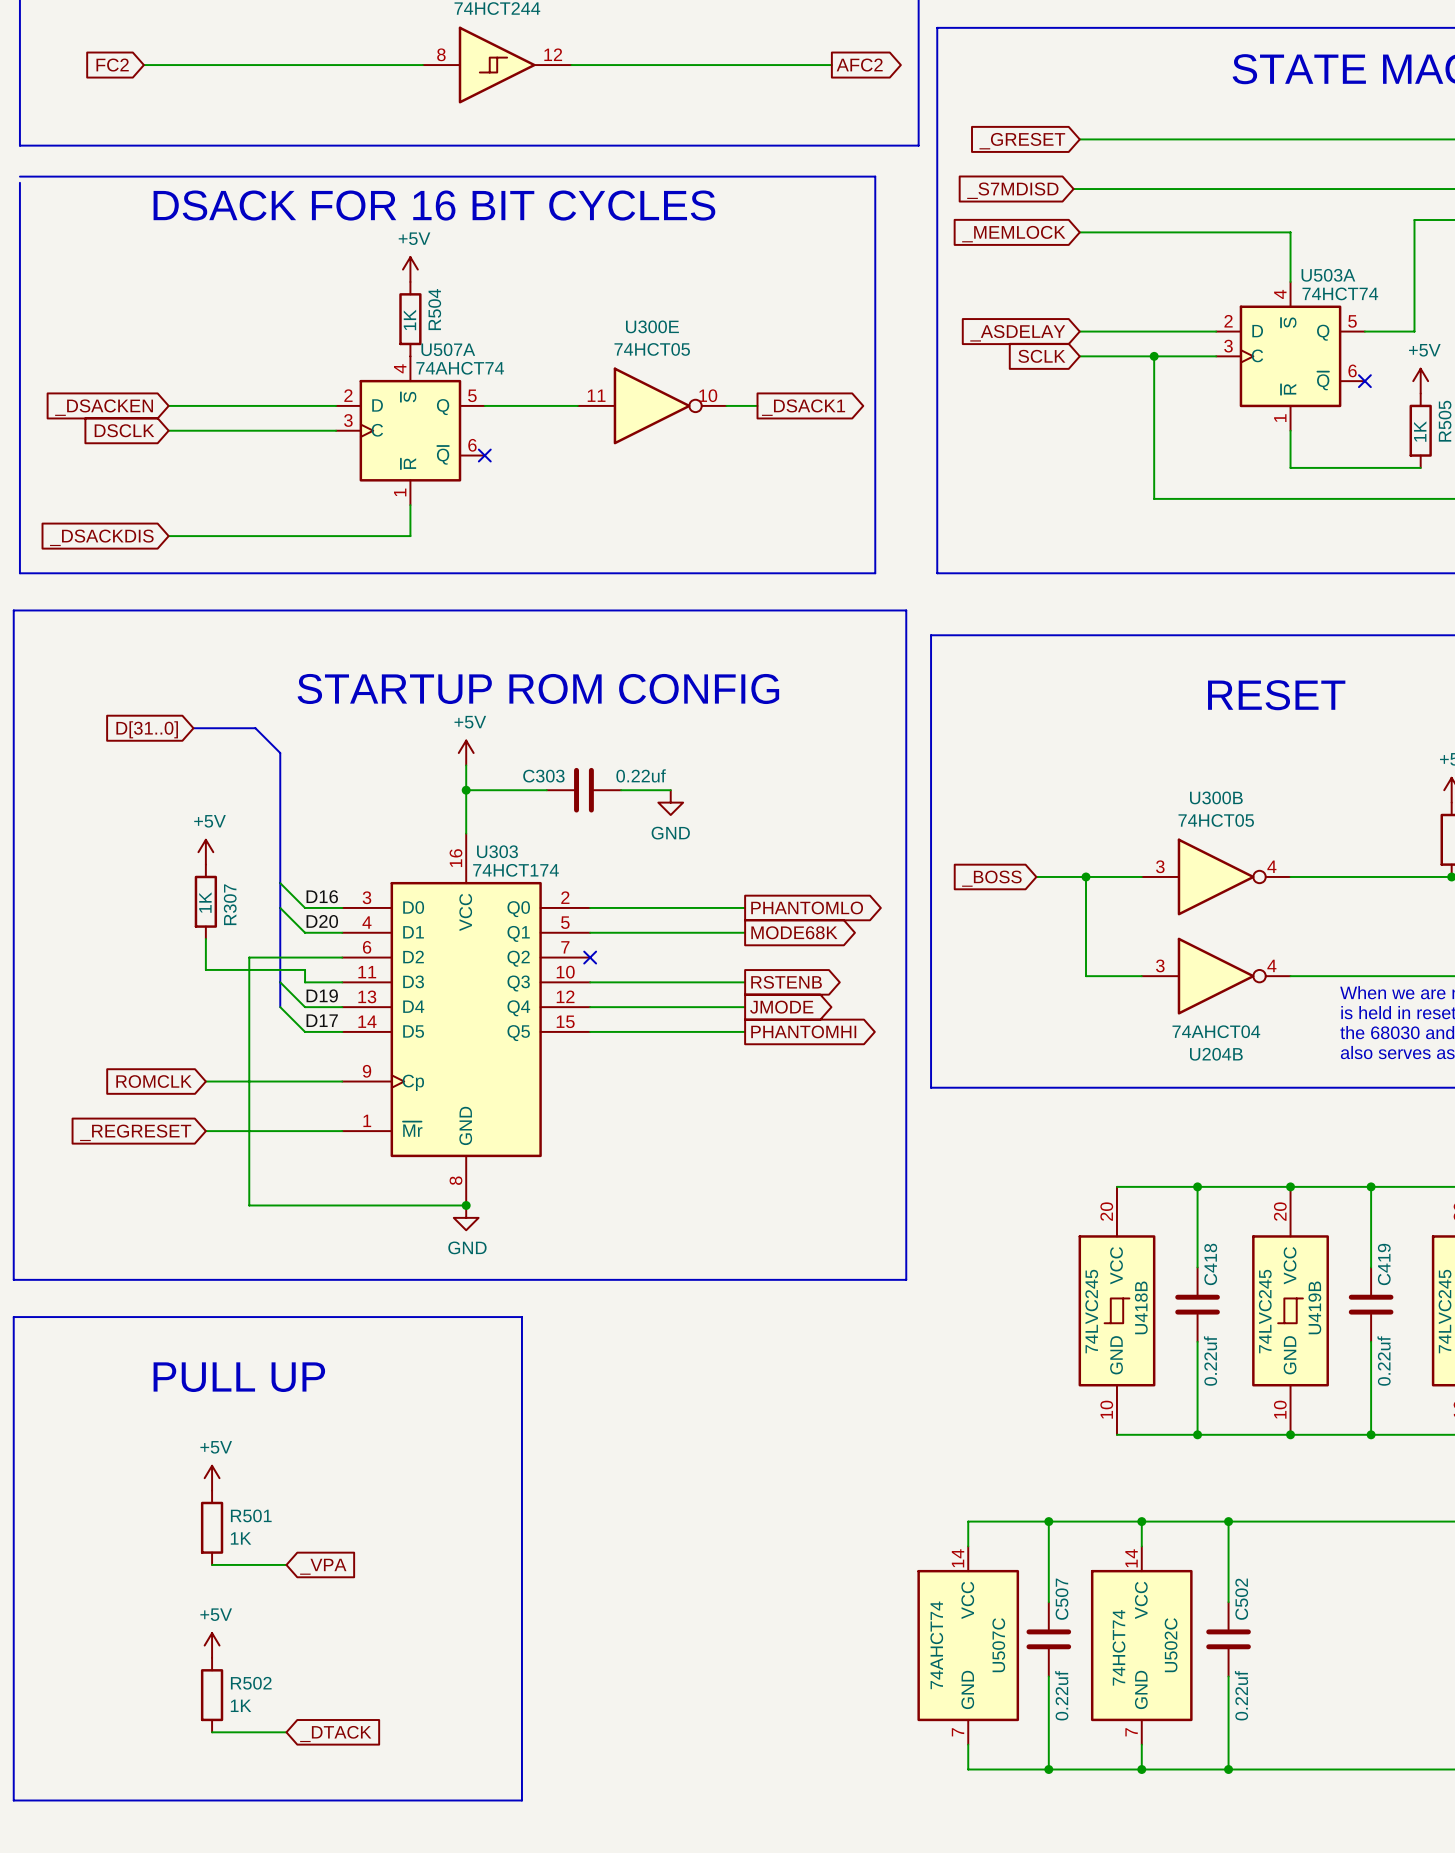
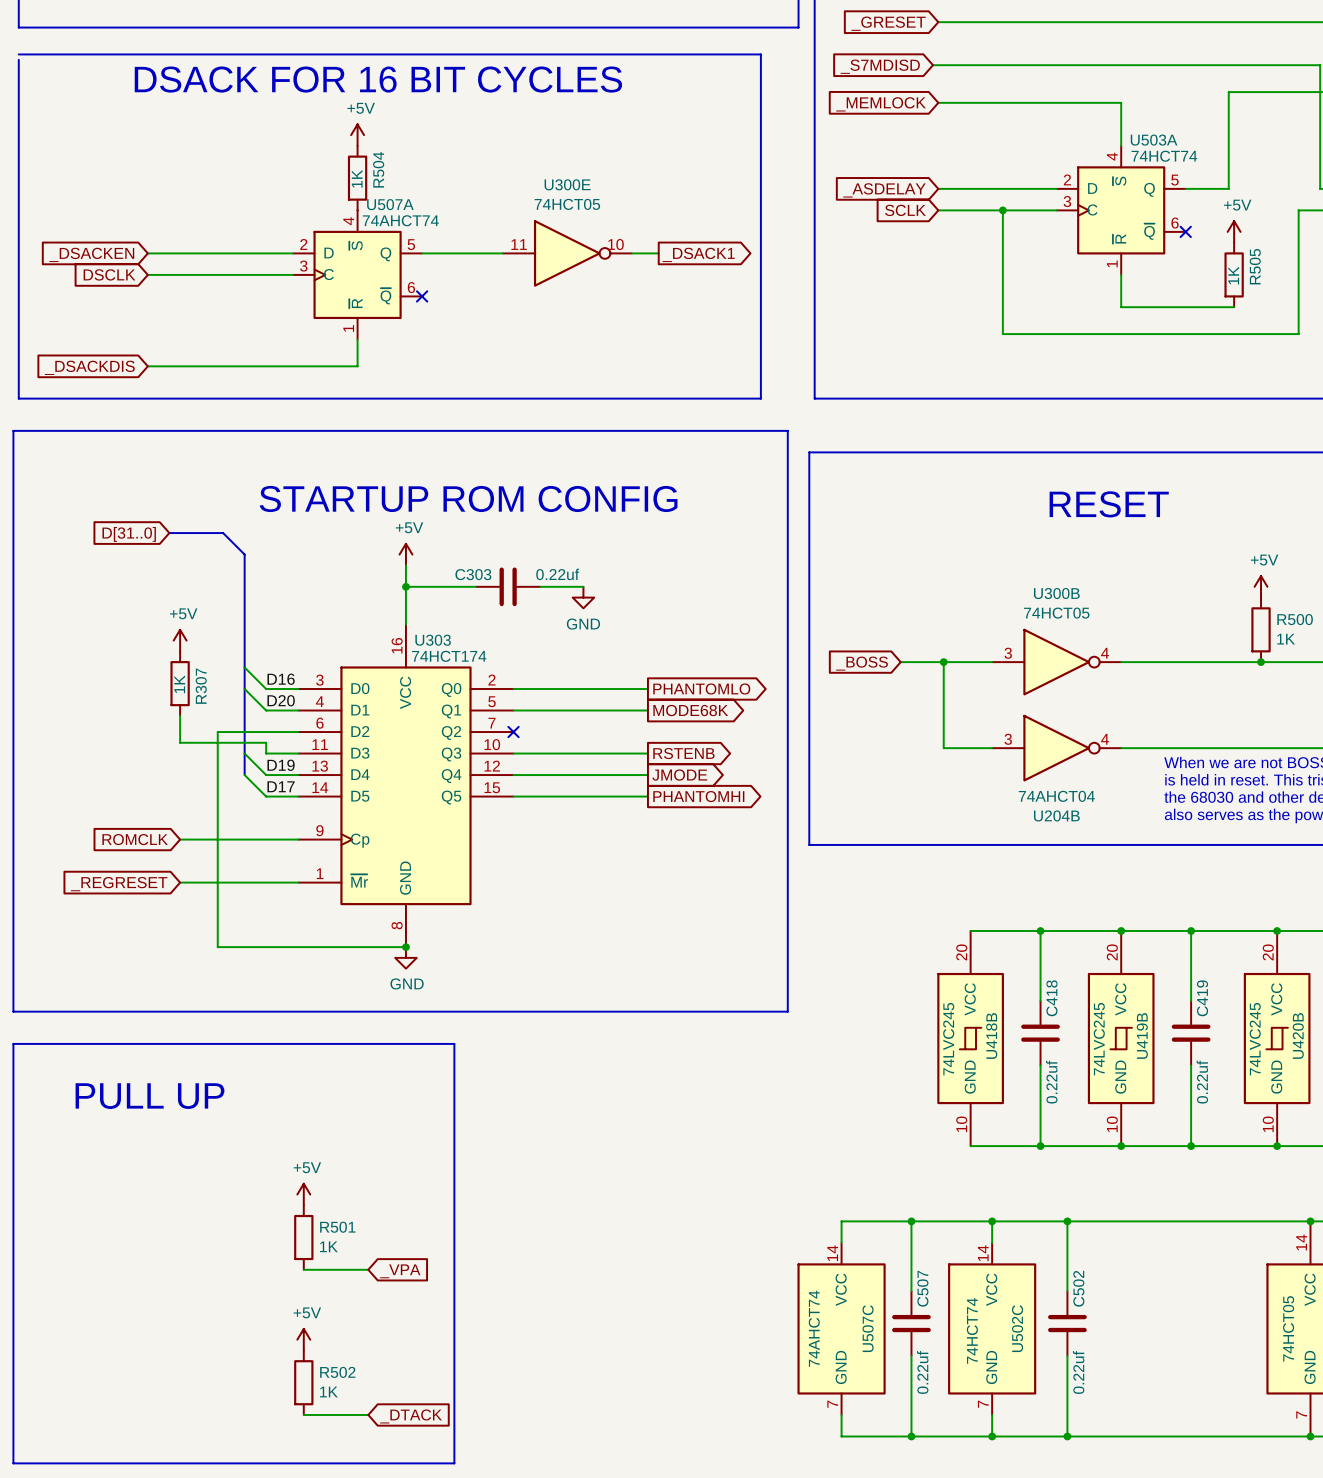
text position: PULL UP (239, 1377) -> PULL UP (150, 1096)
power symbol: +5V (212, 1478) -> none
power symbol: none -> +5V (303, 1194)
R501 position: (212, 1527) -> (303, 1237)
wire: (212, 1564) (286, 1564) -> (303, 1269) (368, 1269)
global label position: _VPA (323, 1566) -> _VPA (400, 1271)
power symbol: +5V (212, 1645) -> none
power symbol: none -> +5V (303, 1339)
R502 position: (212, 1695) -> (303, 1382)
wire: (212, 1732) (286, 1732) -> (303, 1414) (368, 1414)
global label position: _DTACK (335, 1734) -> _DTACK (411, 1416)

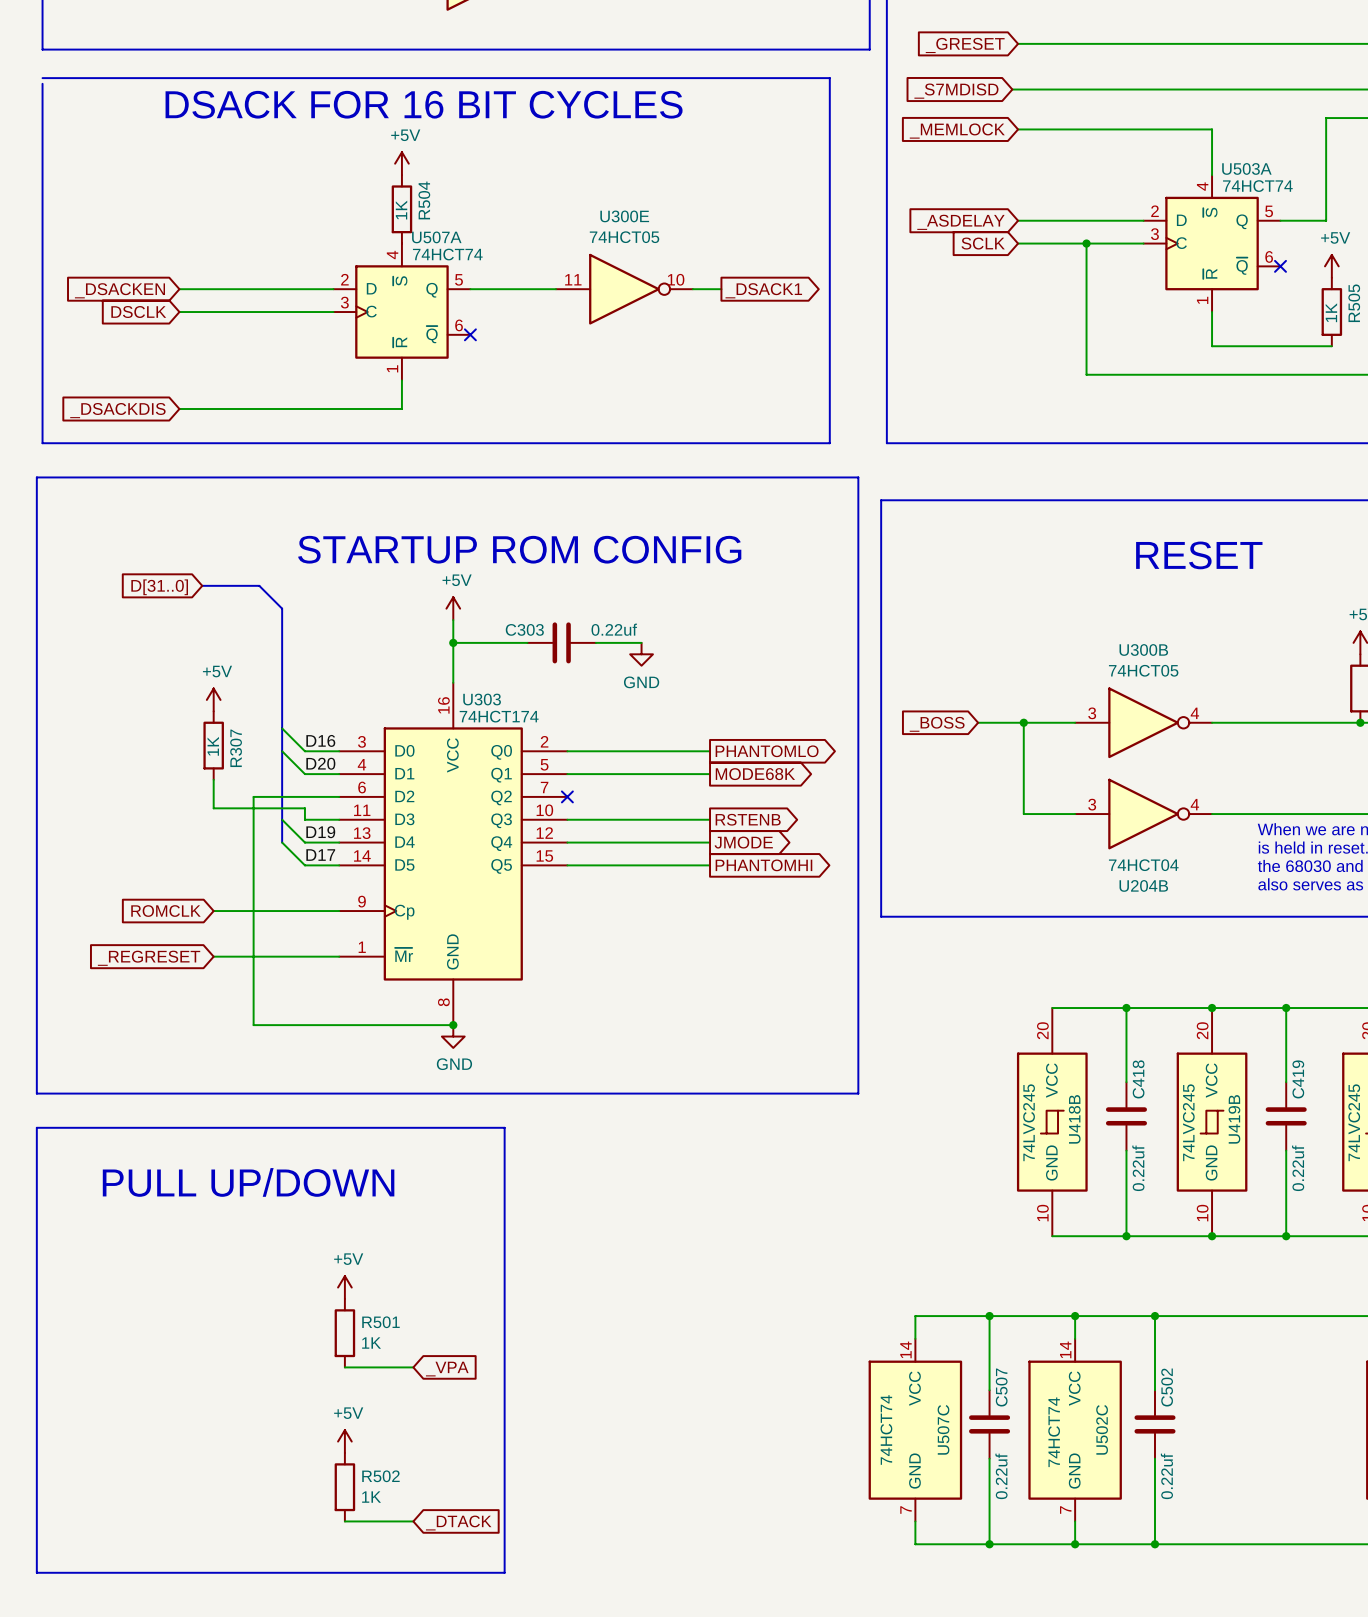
U507A value: 74AHCT74 (400, 220) -> 74HCT74 (447, 254)
U204B value: 74AHCT04 (1056, 796) -> 74HCT04 (1143, 865)
text: PULL UP (150, 1096) -> PULL UP/DOWN (248, 1182)
U507C value: 74AHCT74 (814, 1328) -> 74HCT74 (886, 1429)

